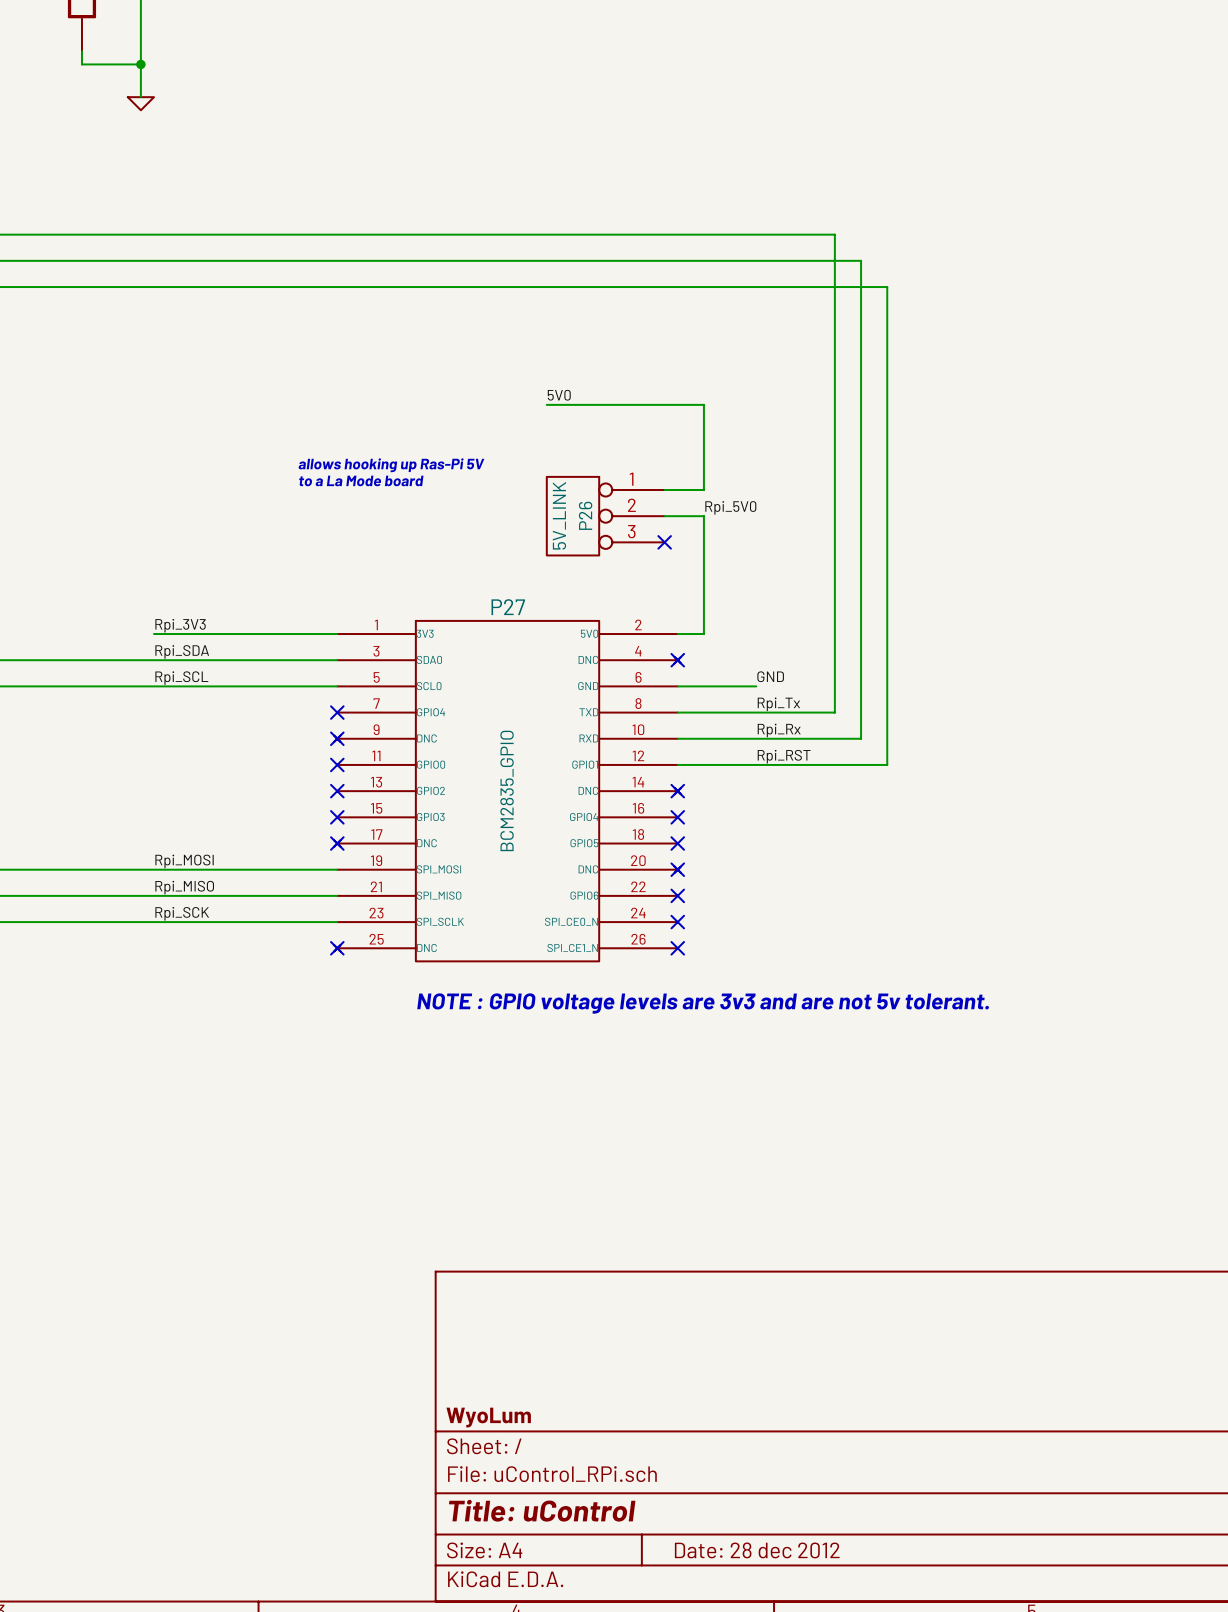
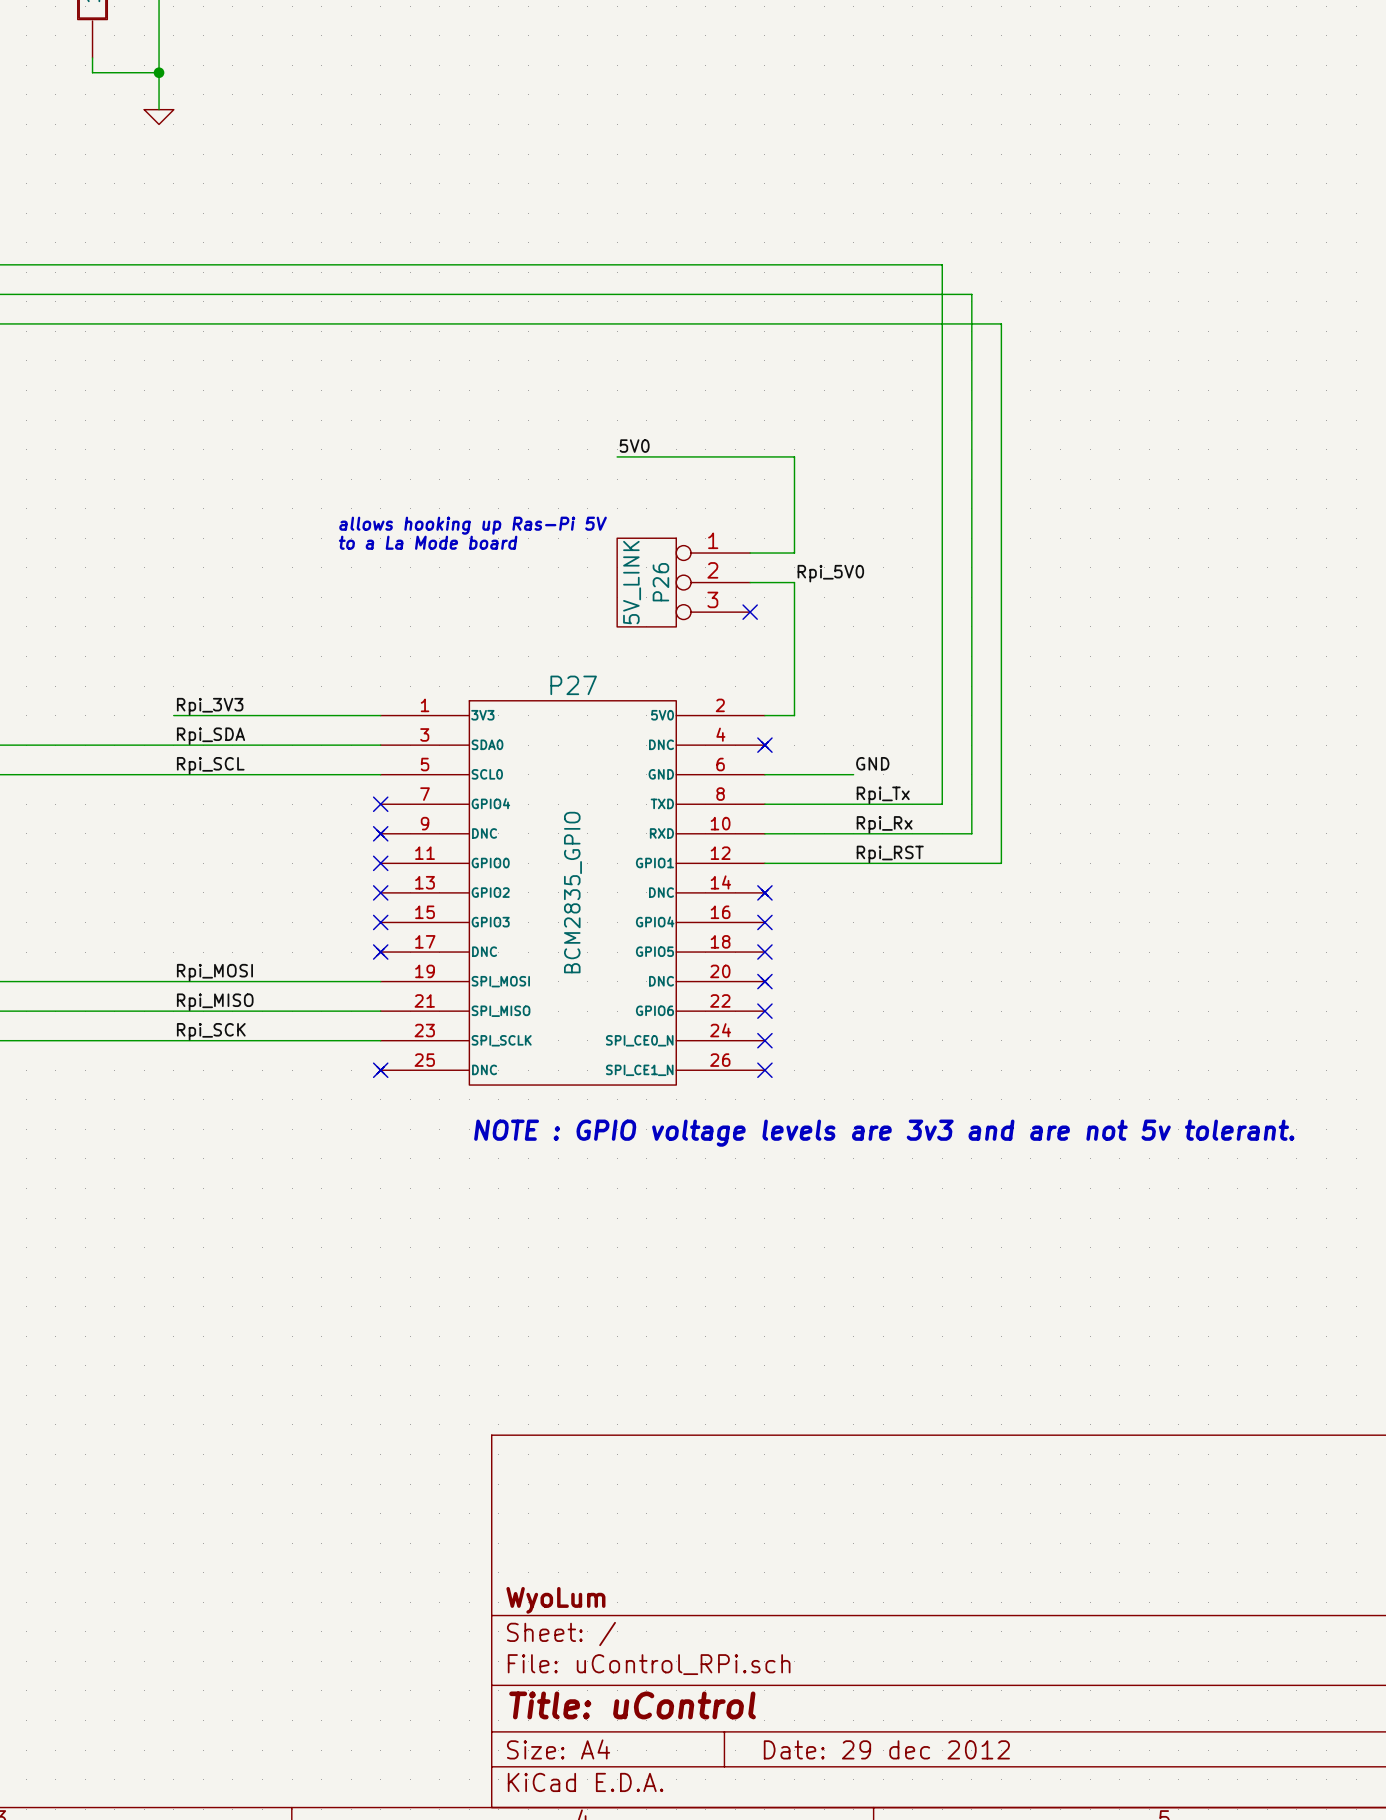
title block: Date: 28 dec 2012 (757, 1550) -> Date: 29 dec 2012 (886, 1749)

